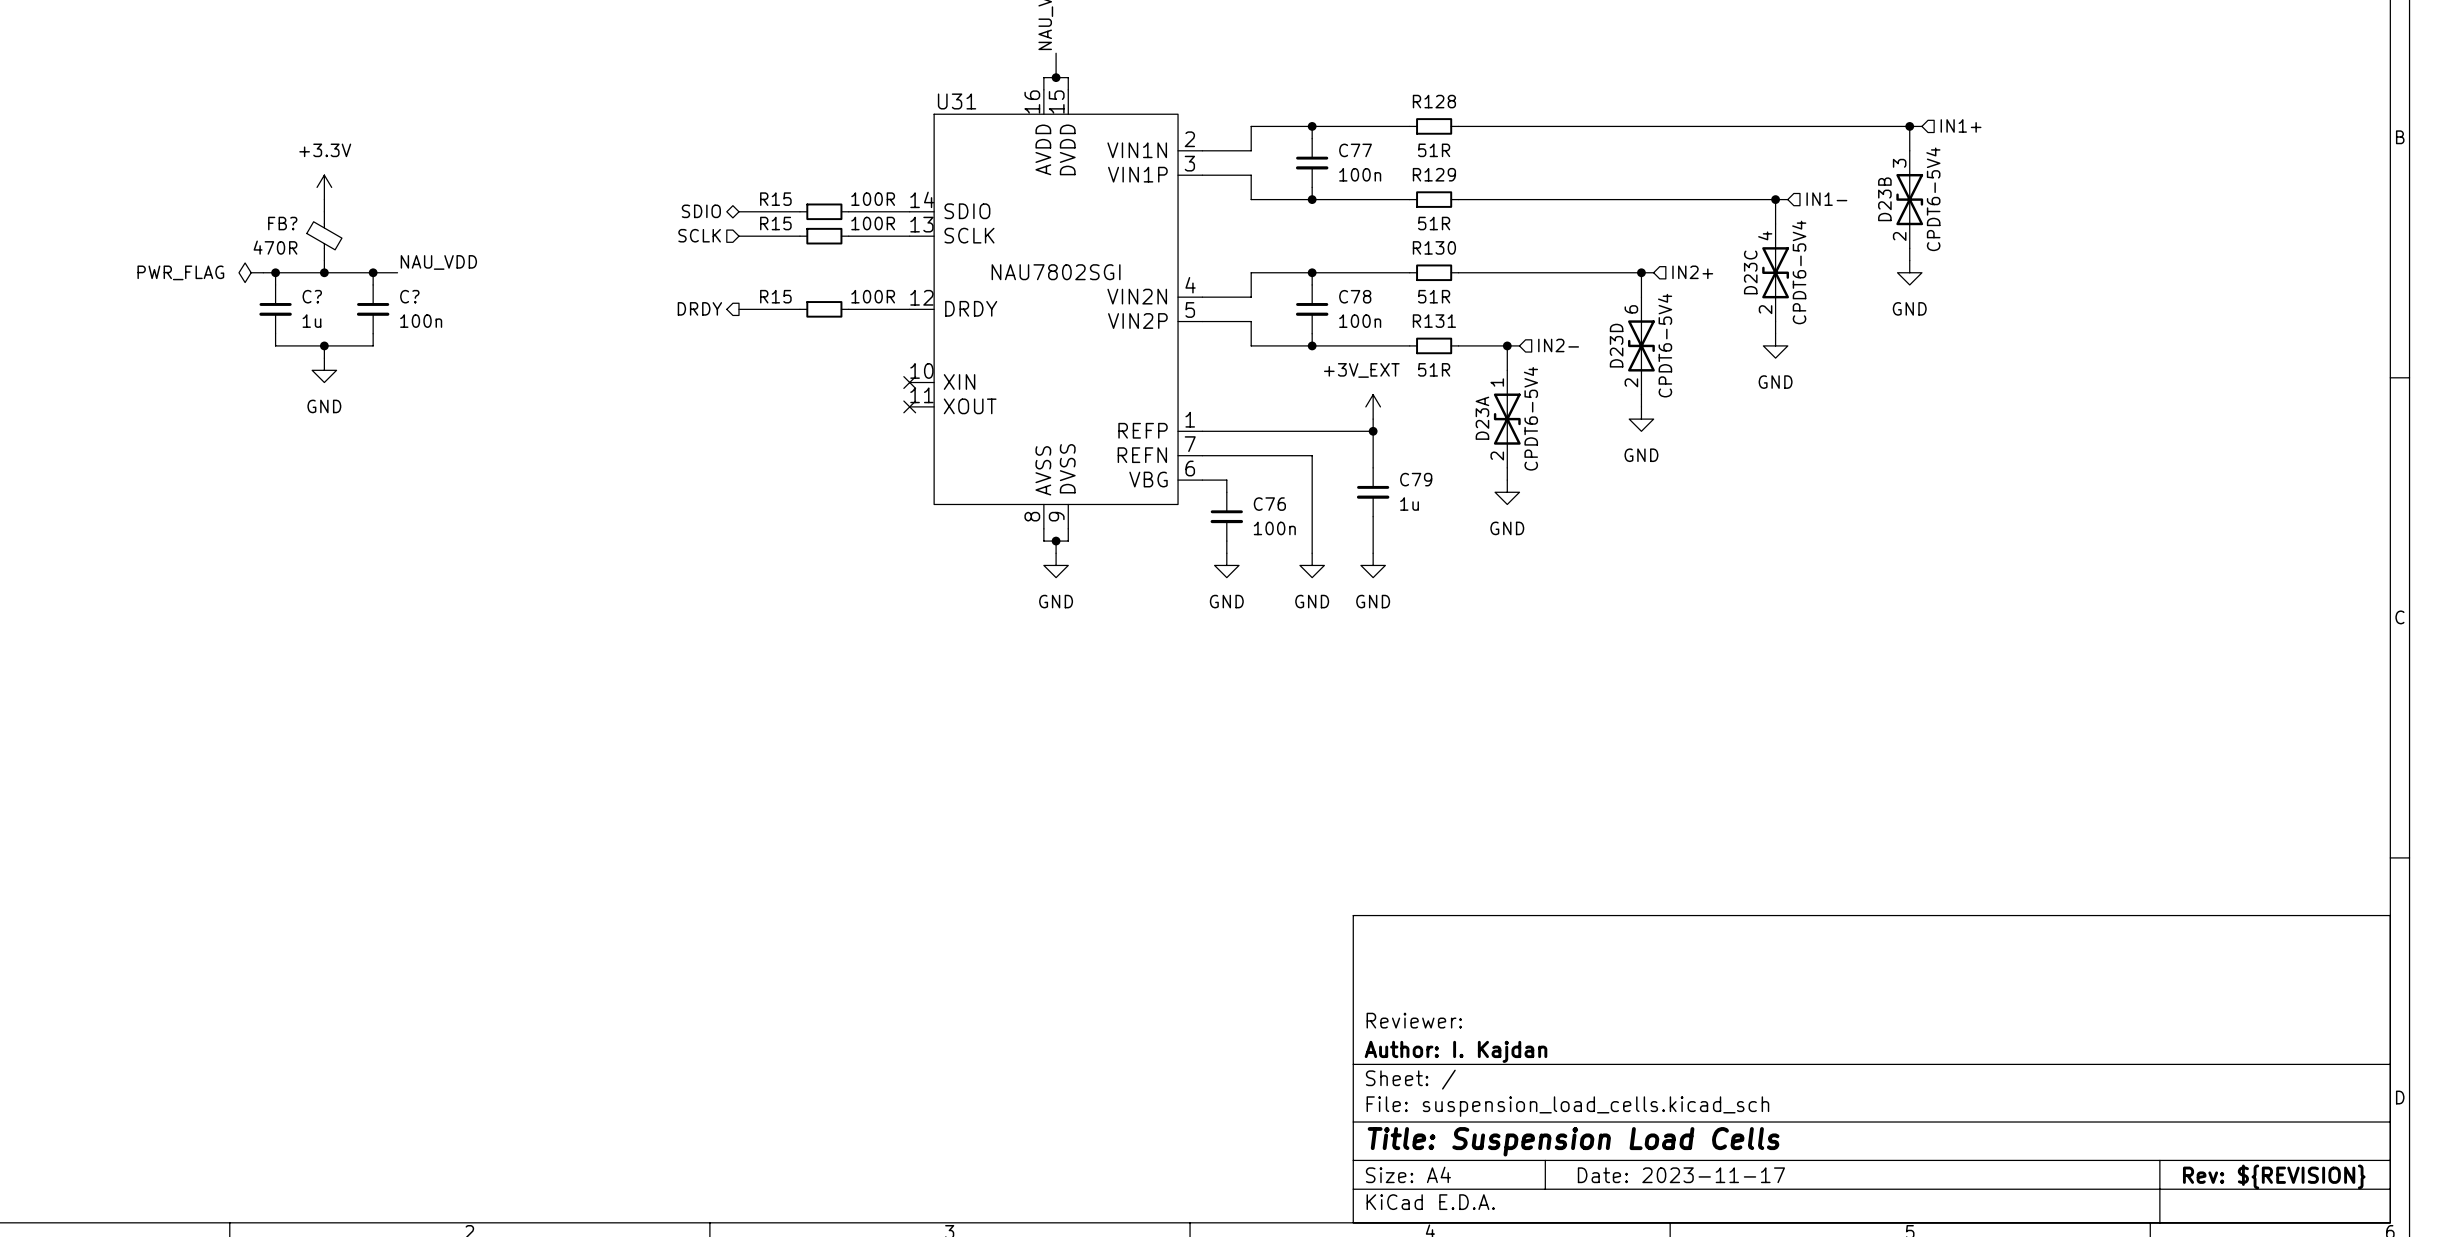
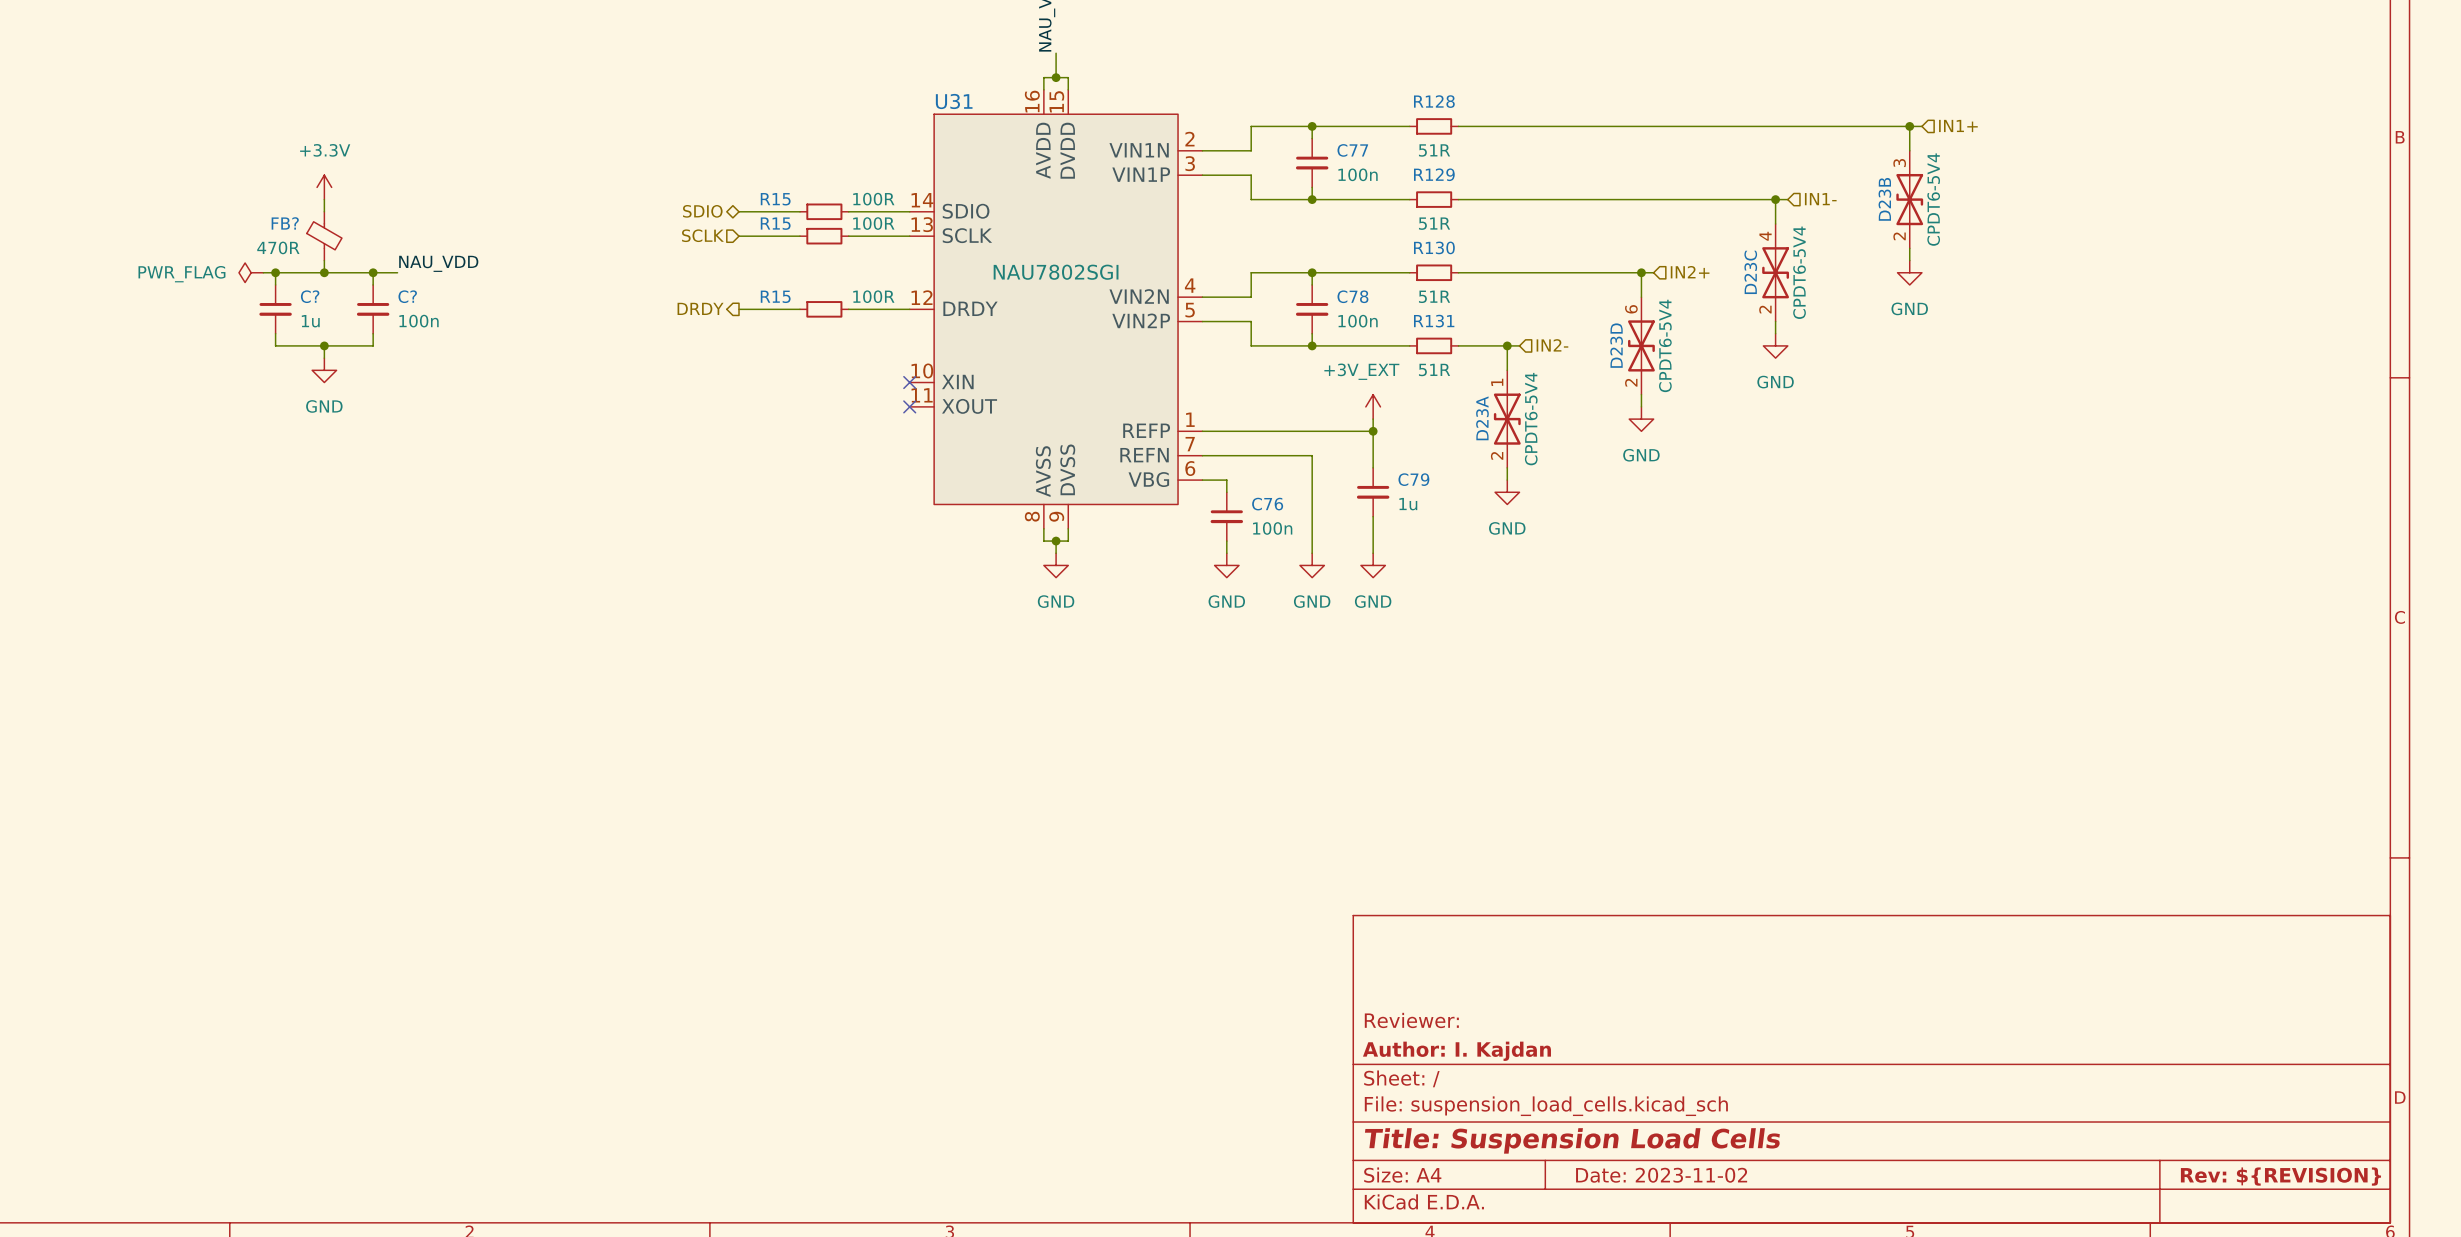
title block: Date: 2023-11-17 (1681, 1175) -> Date: 2023-11-02 (1661, 1175)

